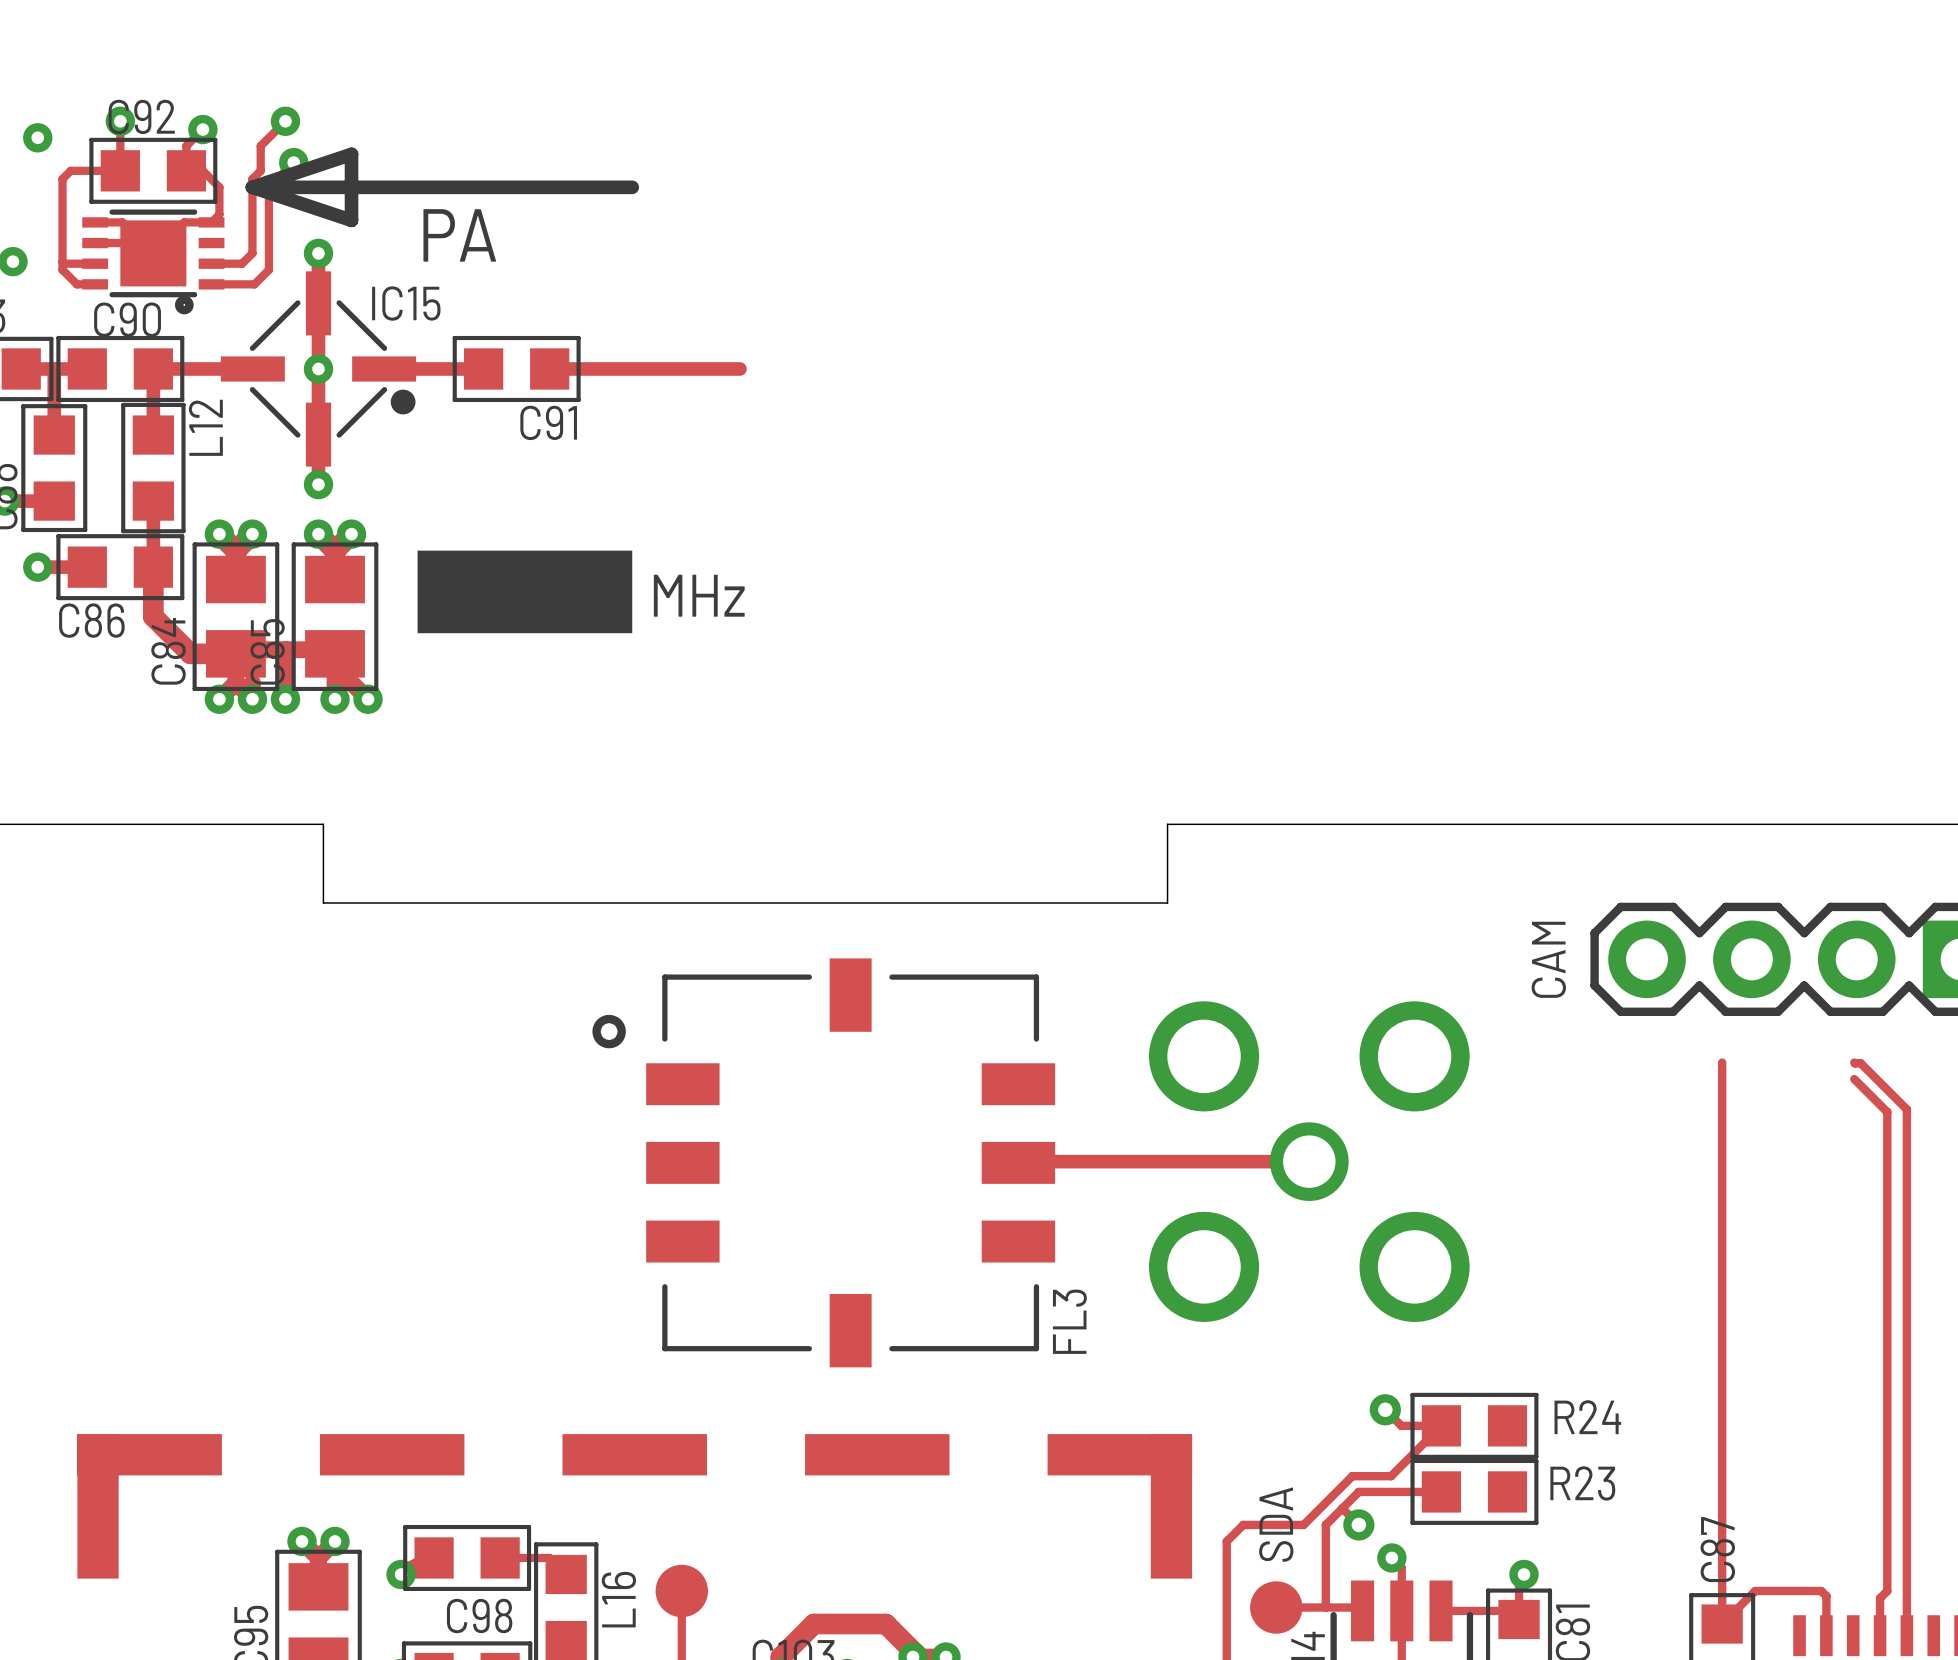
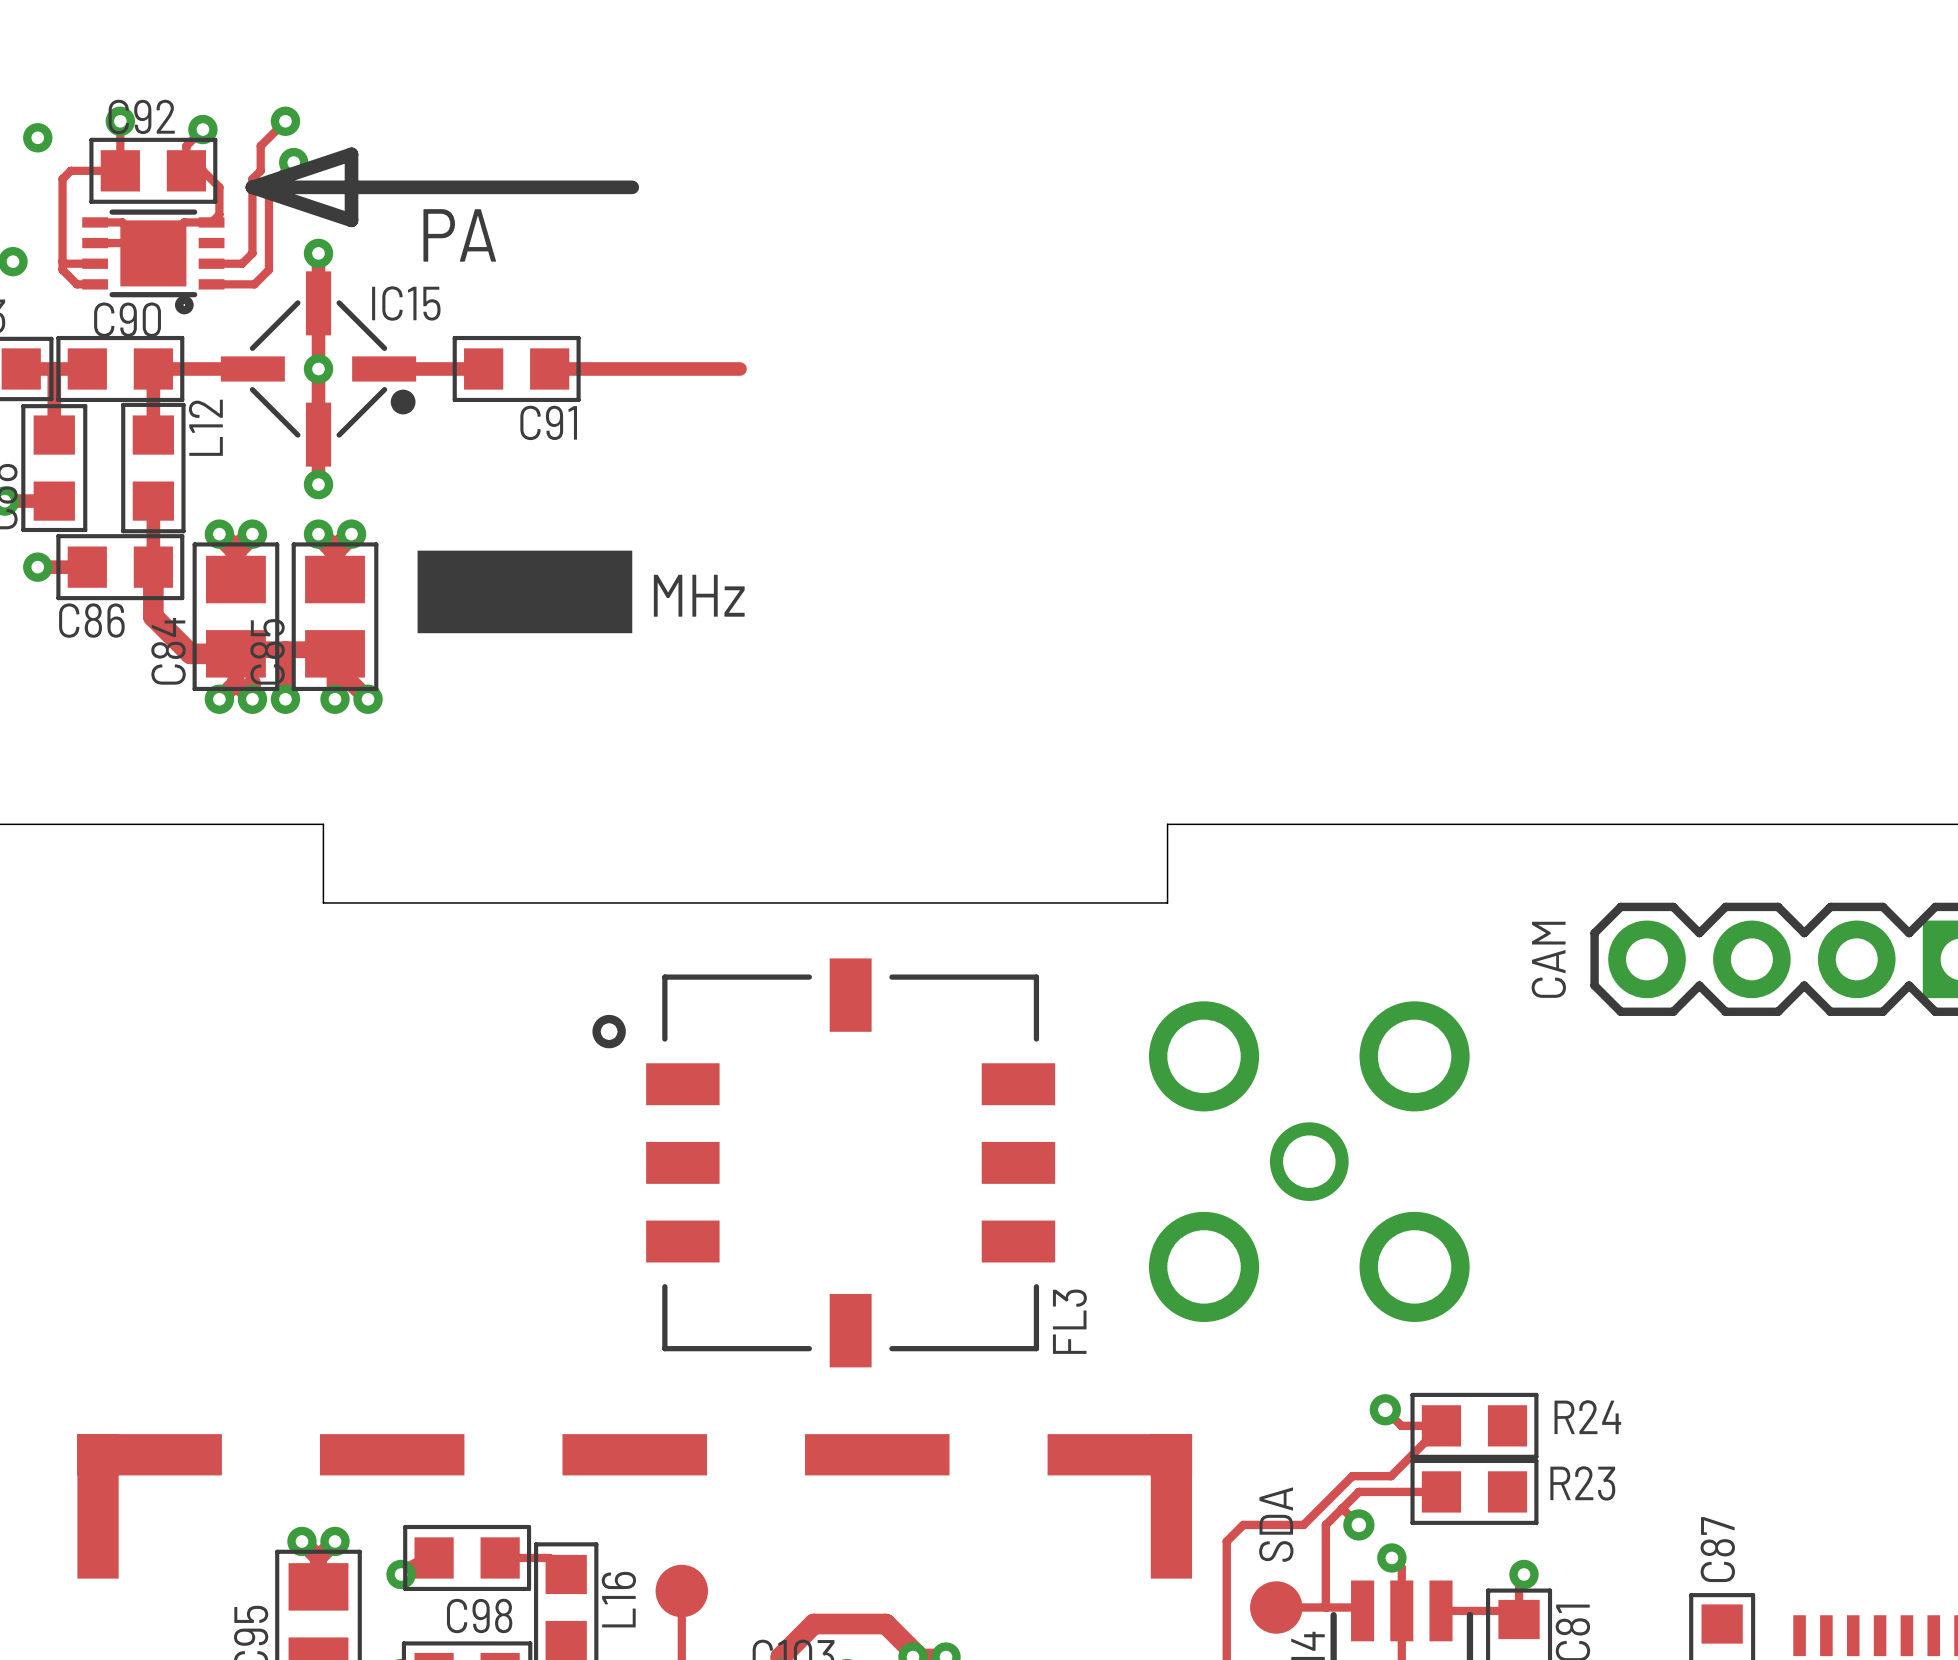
track: (1722, 1062) (1722, 1624) (1755, 1591) (1821, 1591) (1826, 1596) (1826, 1635) -> none
track: (1854, 1062) (1860, 1063) (1906, 1109) (1906, 1635) -> none
track: (1854, 1079) (1887, 1112) (1887, 1591) (1880, 1598) (1880, 1635) -> none
track: (1309, 1161) (1018, 1162) -> none

